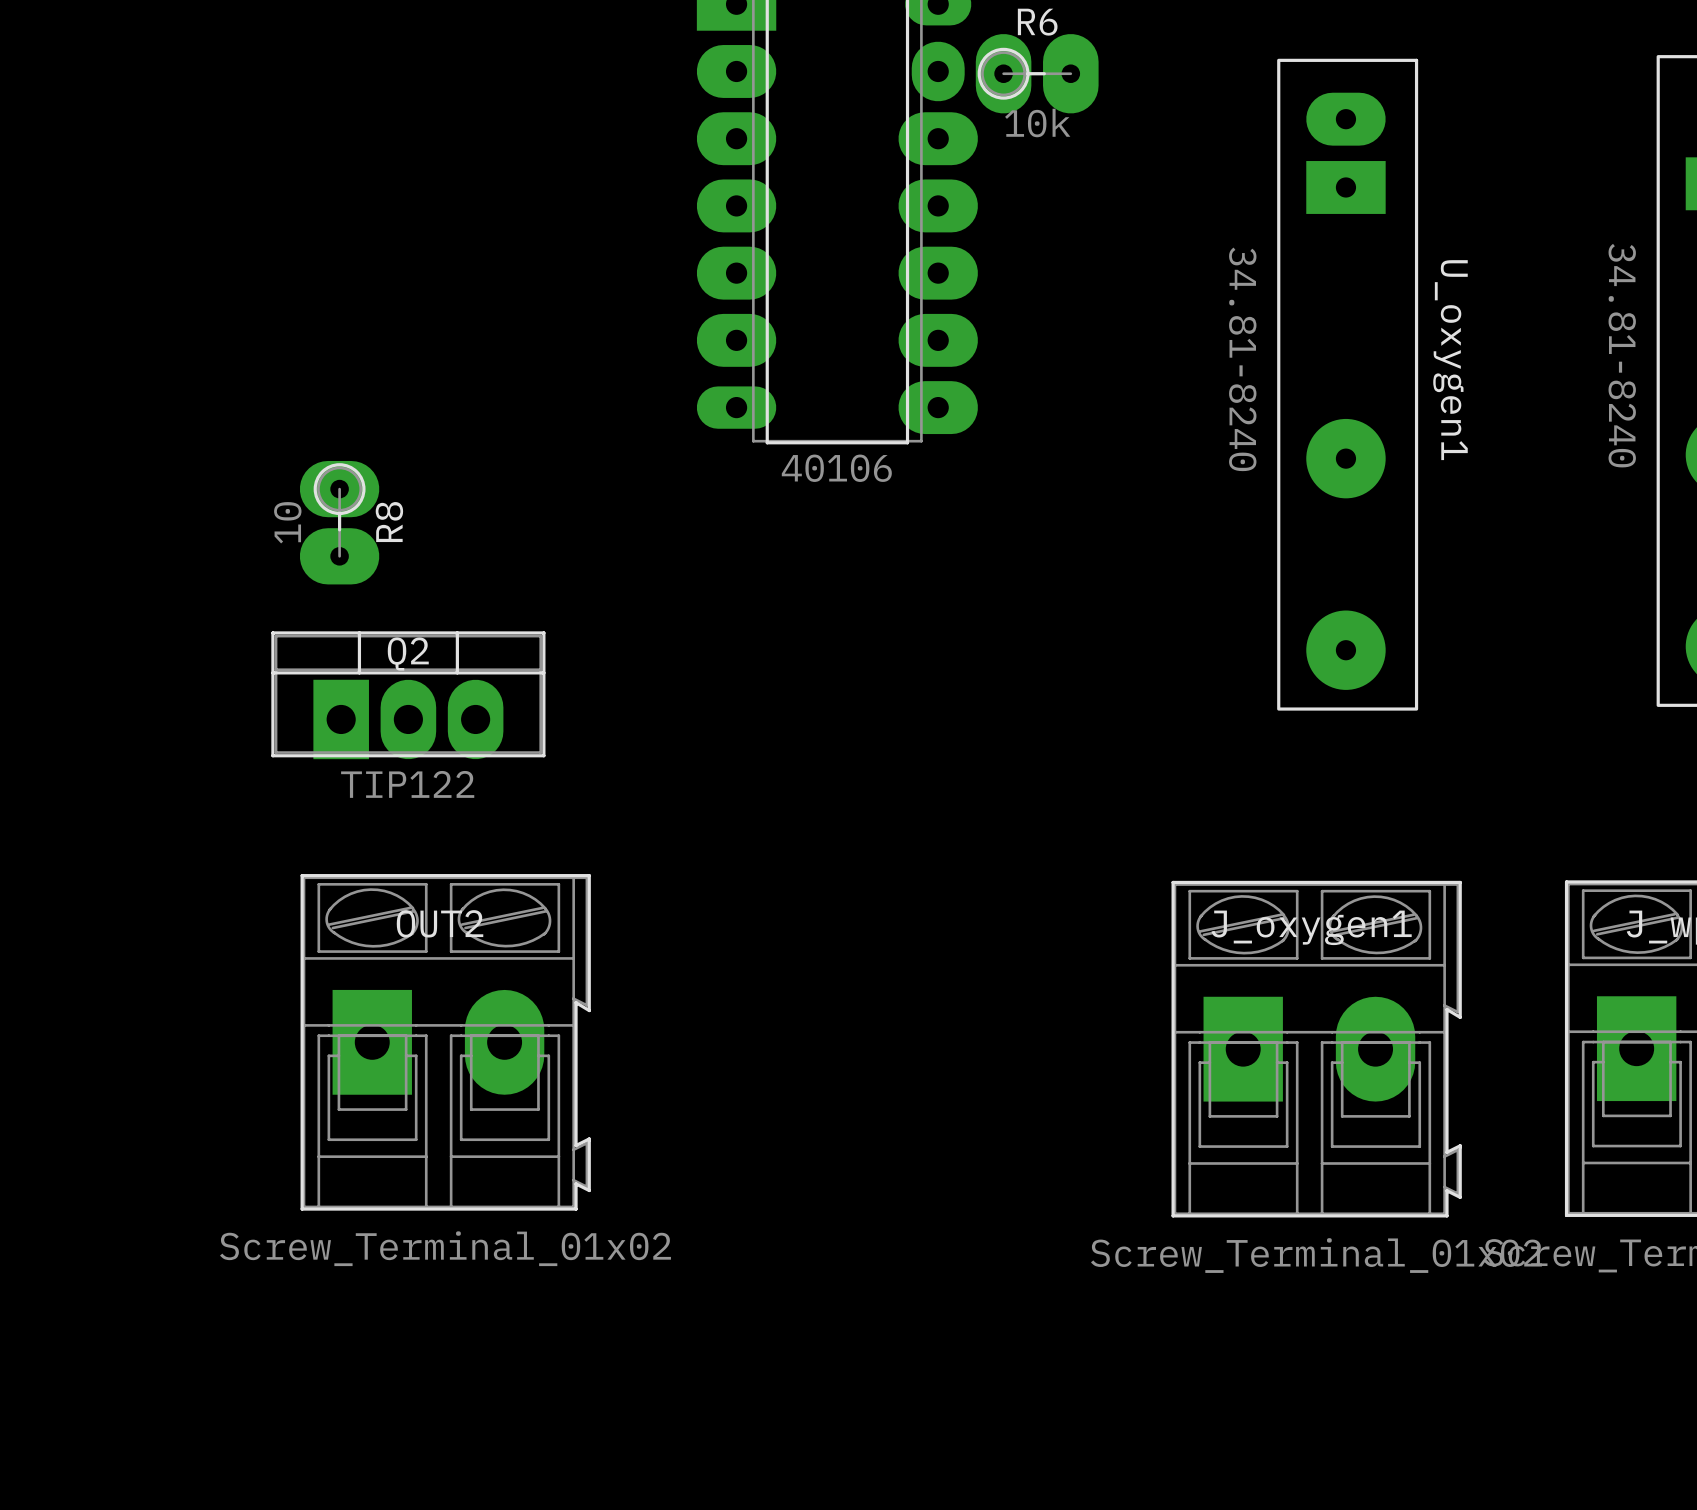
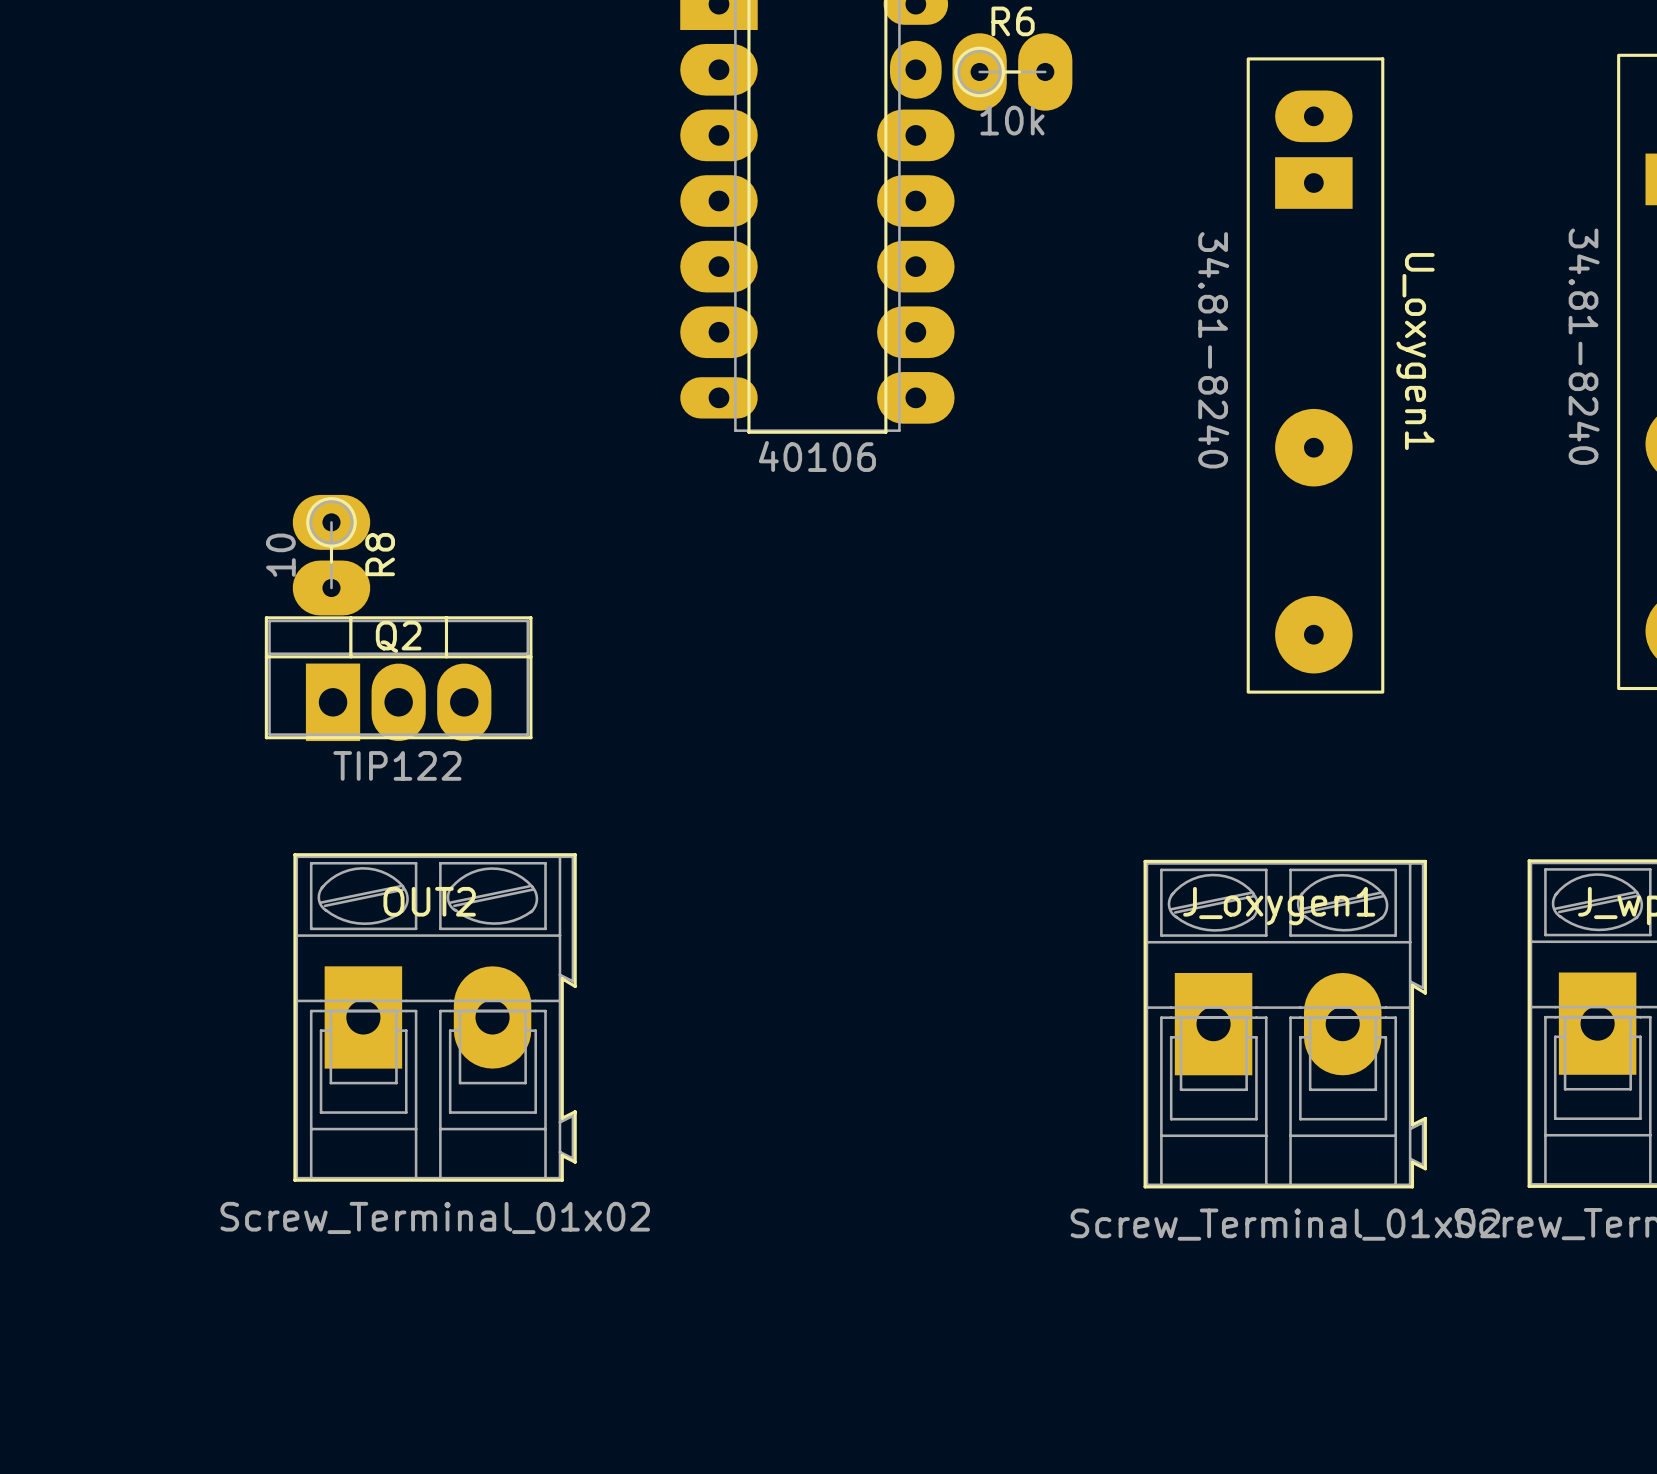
R8 position: (339, 522) -> (331, 555)

